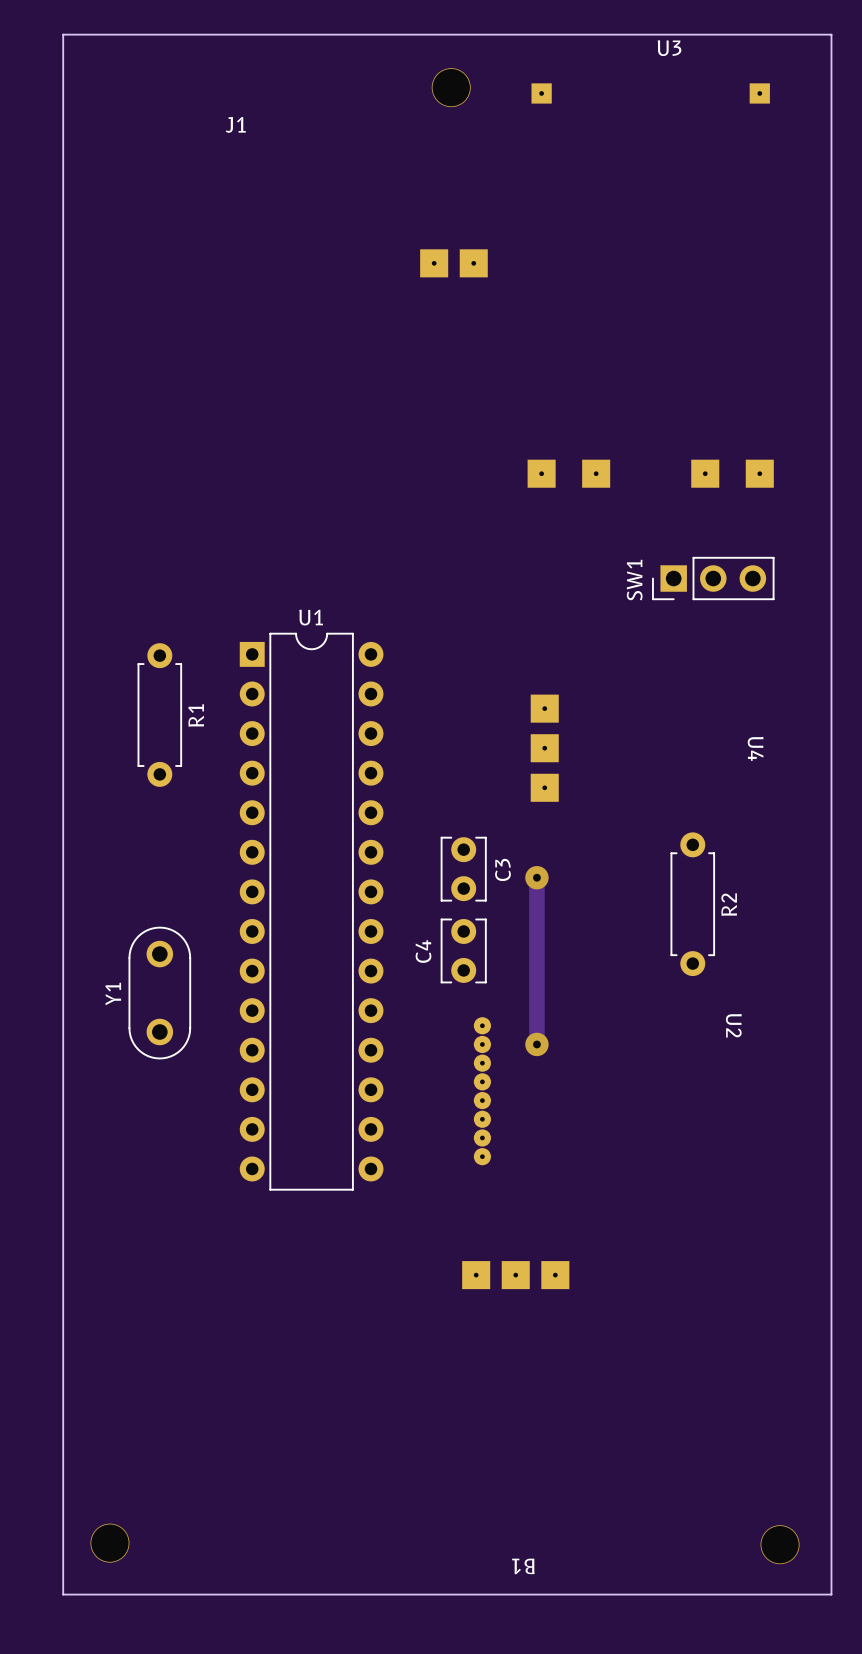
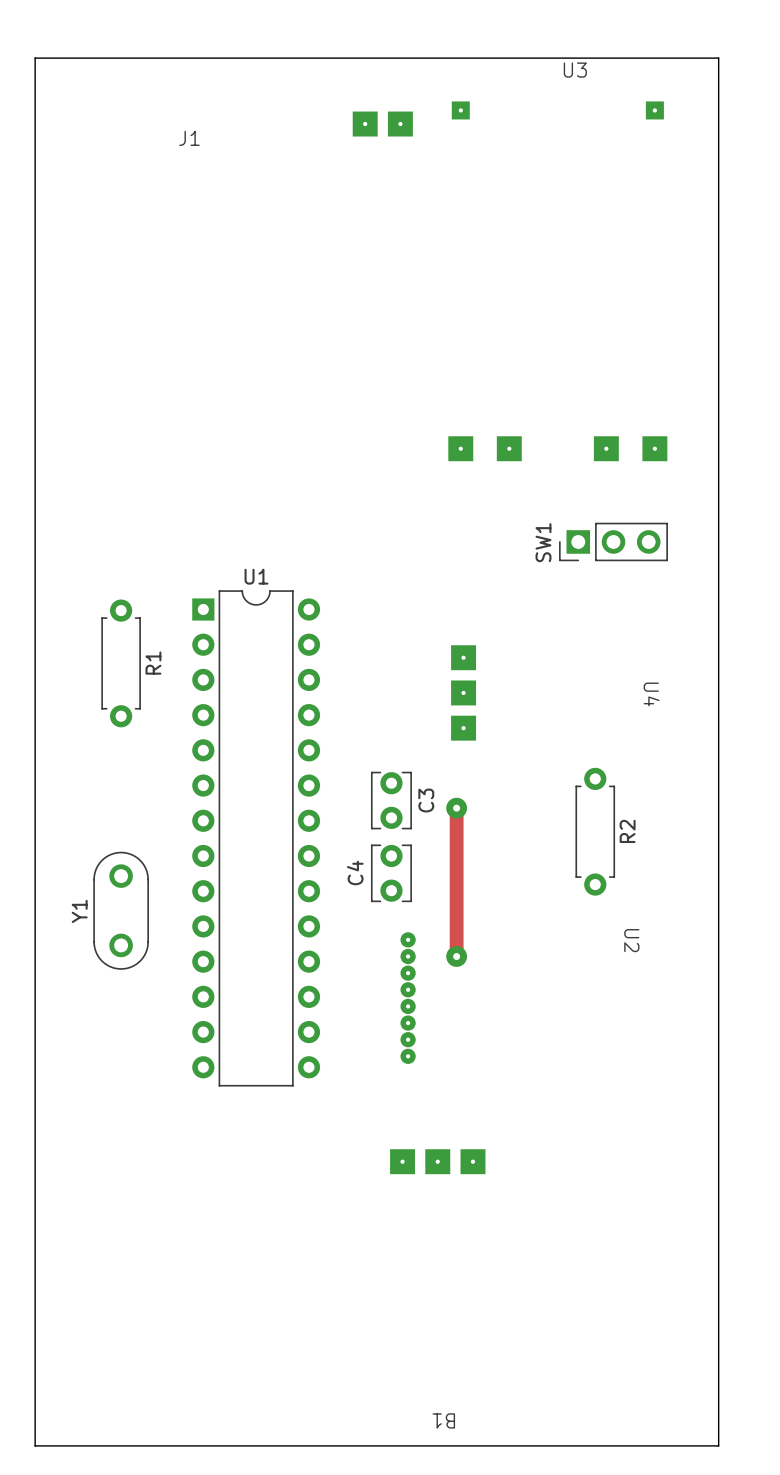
via: (451, 87) -> none
J1 position: (453, 263) -> (382, 124)
via: (109, 1543) -> none
via: (780, 1544) -> none

